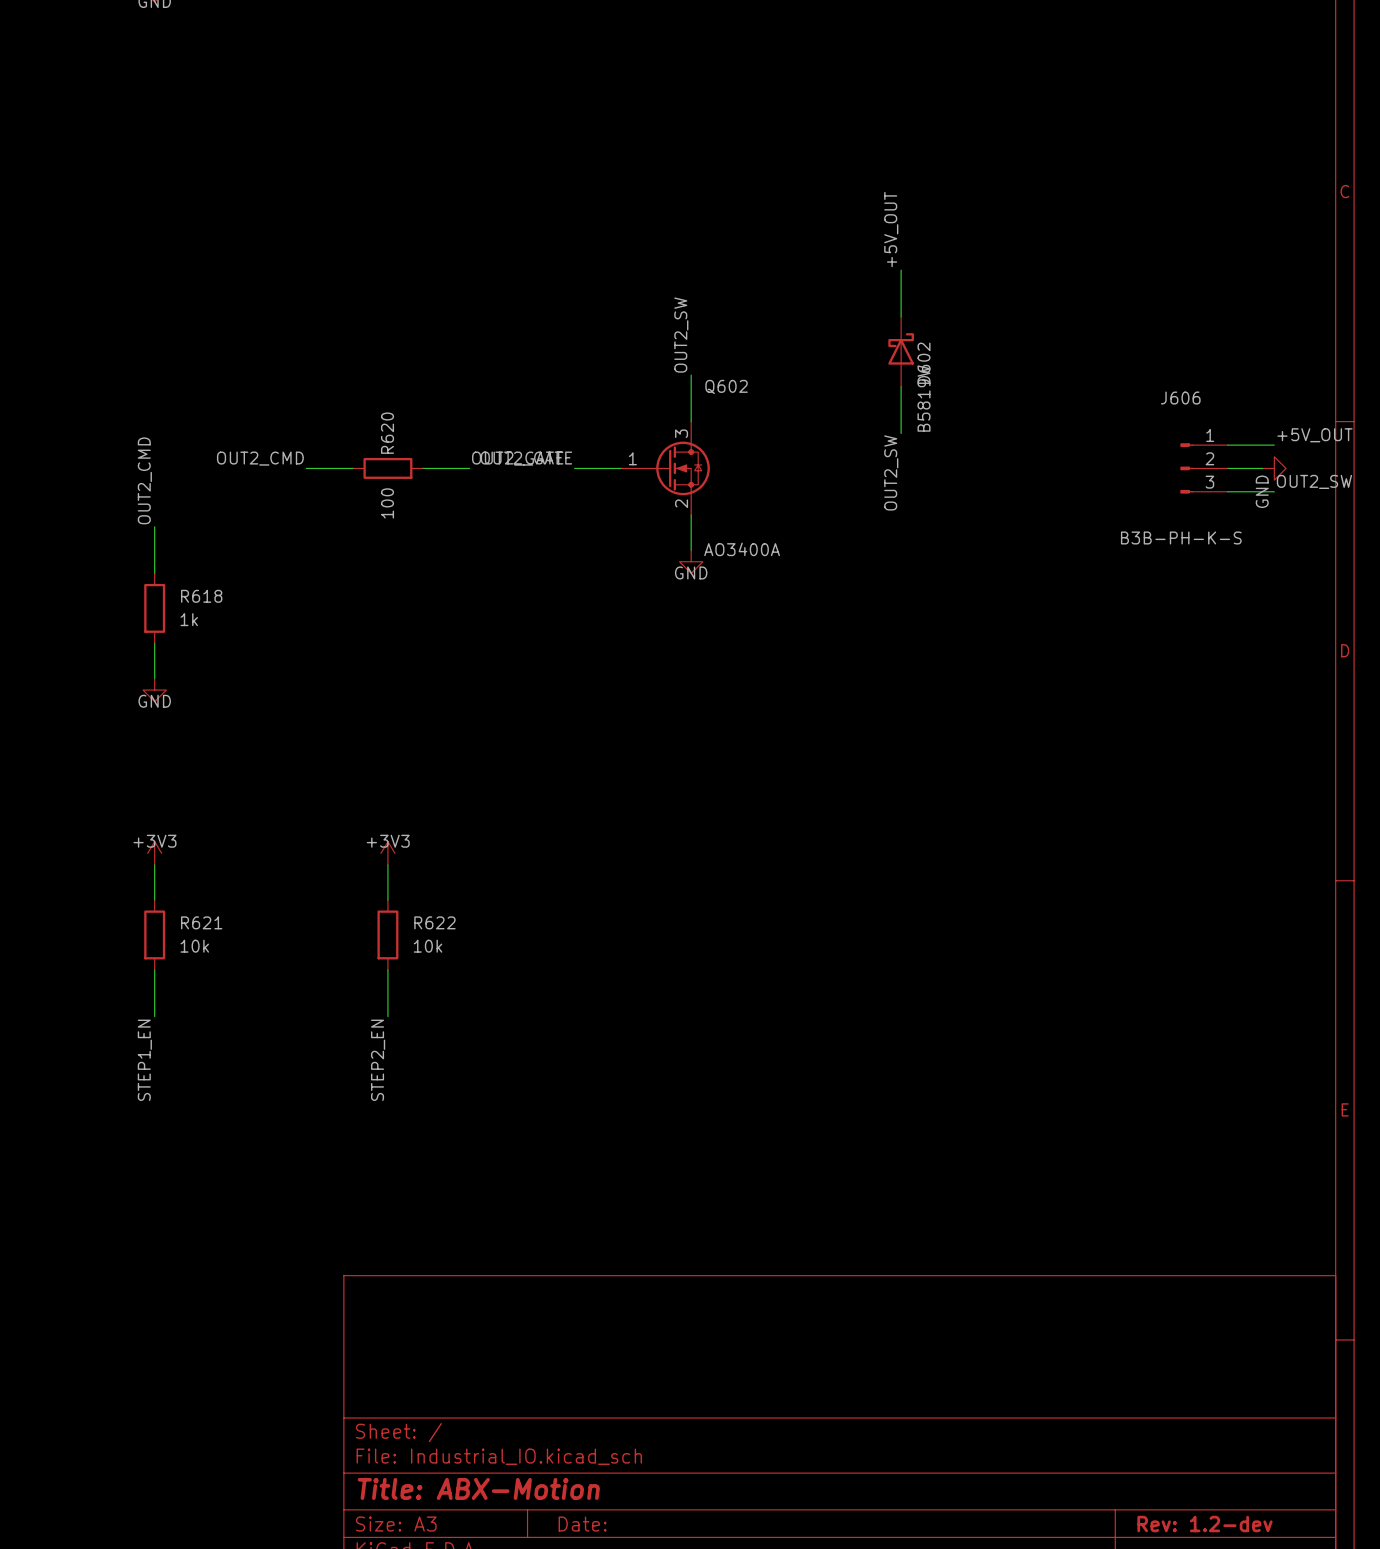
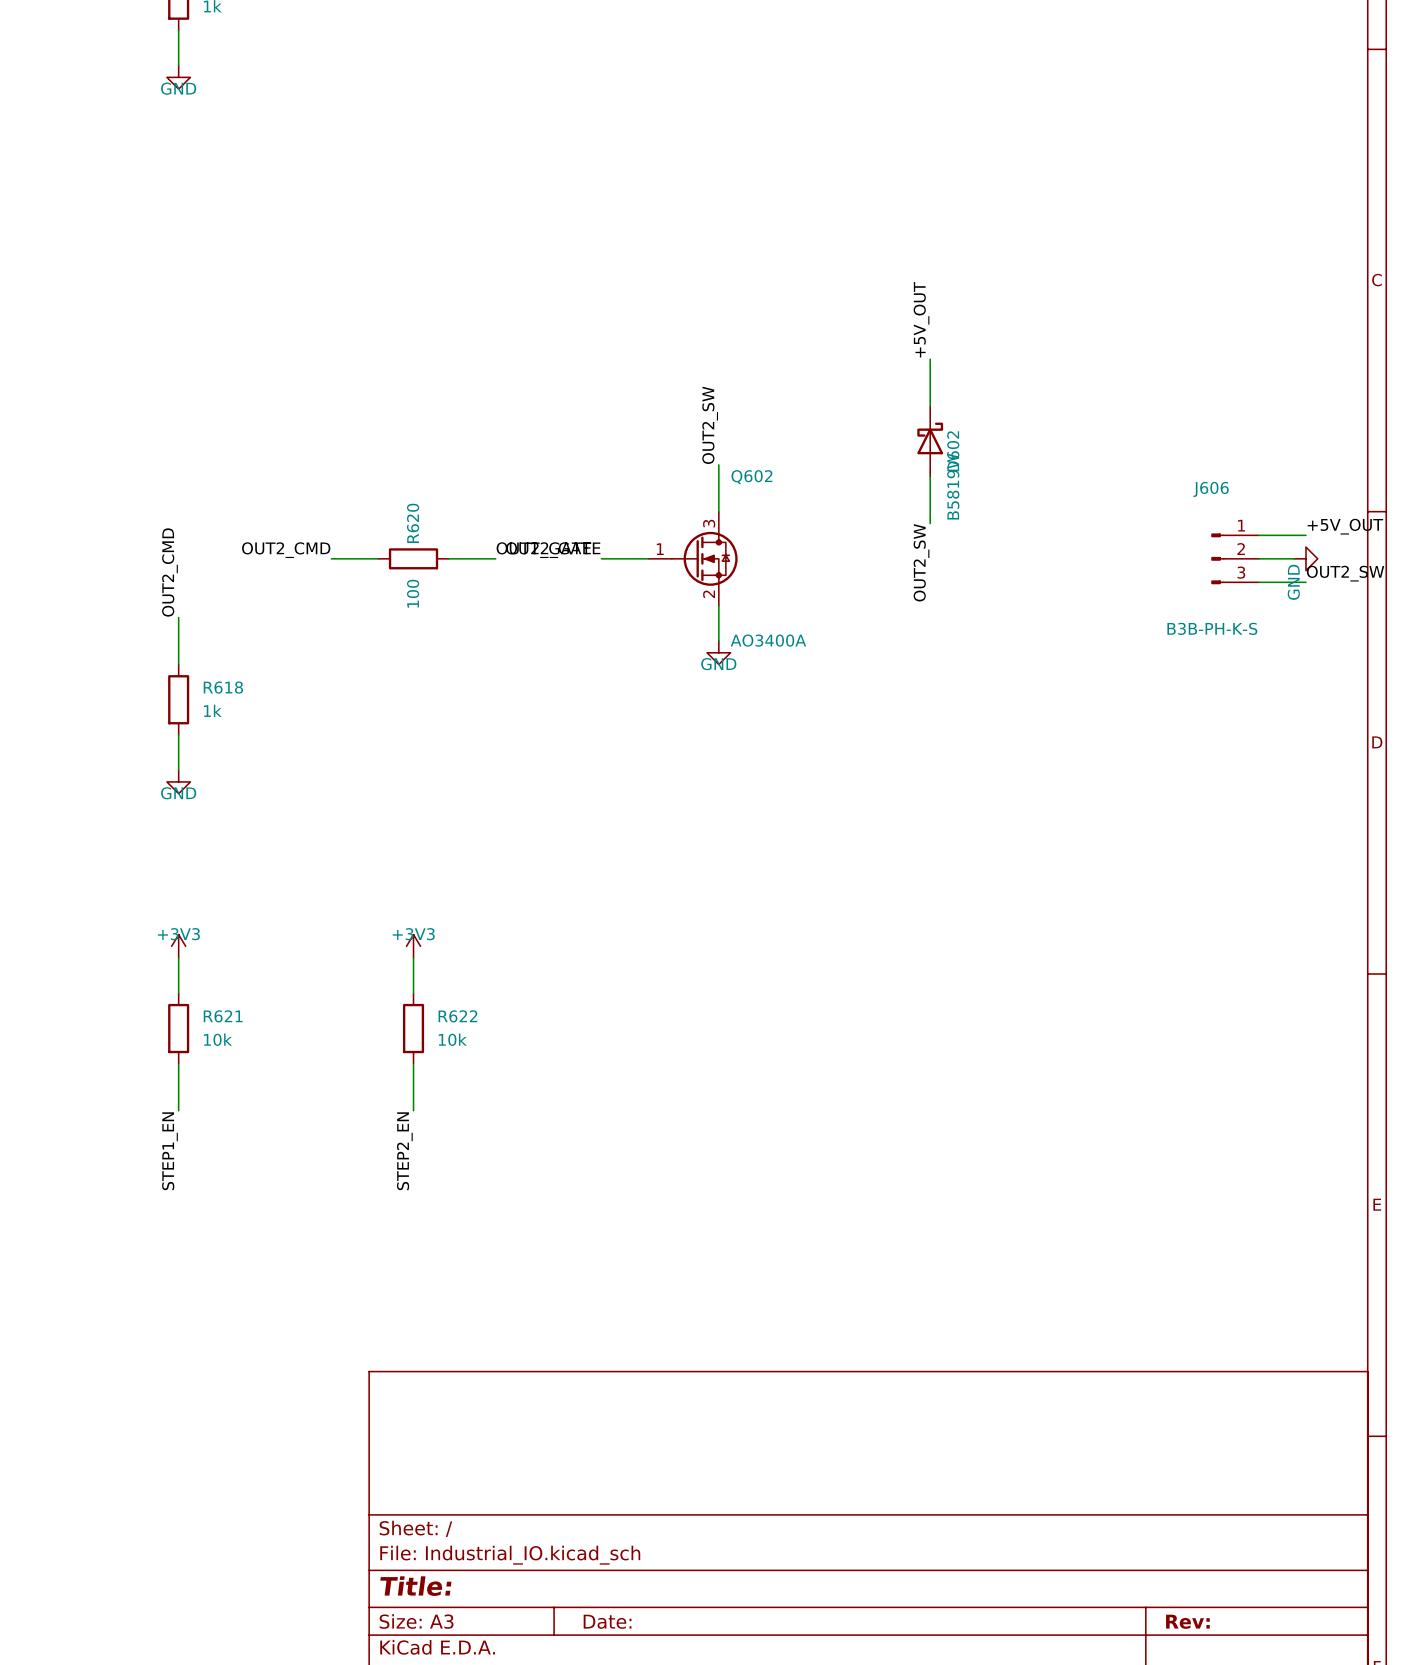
title block: Title: ABX-Motion (478, 1488) -> Title: (415, 1586)
title block: Rev: 1.2-dev (1204, 1524) -> Rev: (1187, 1621)

